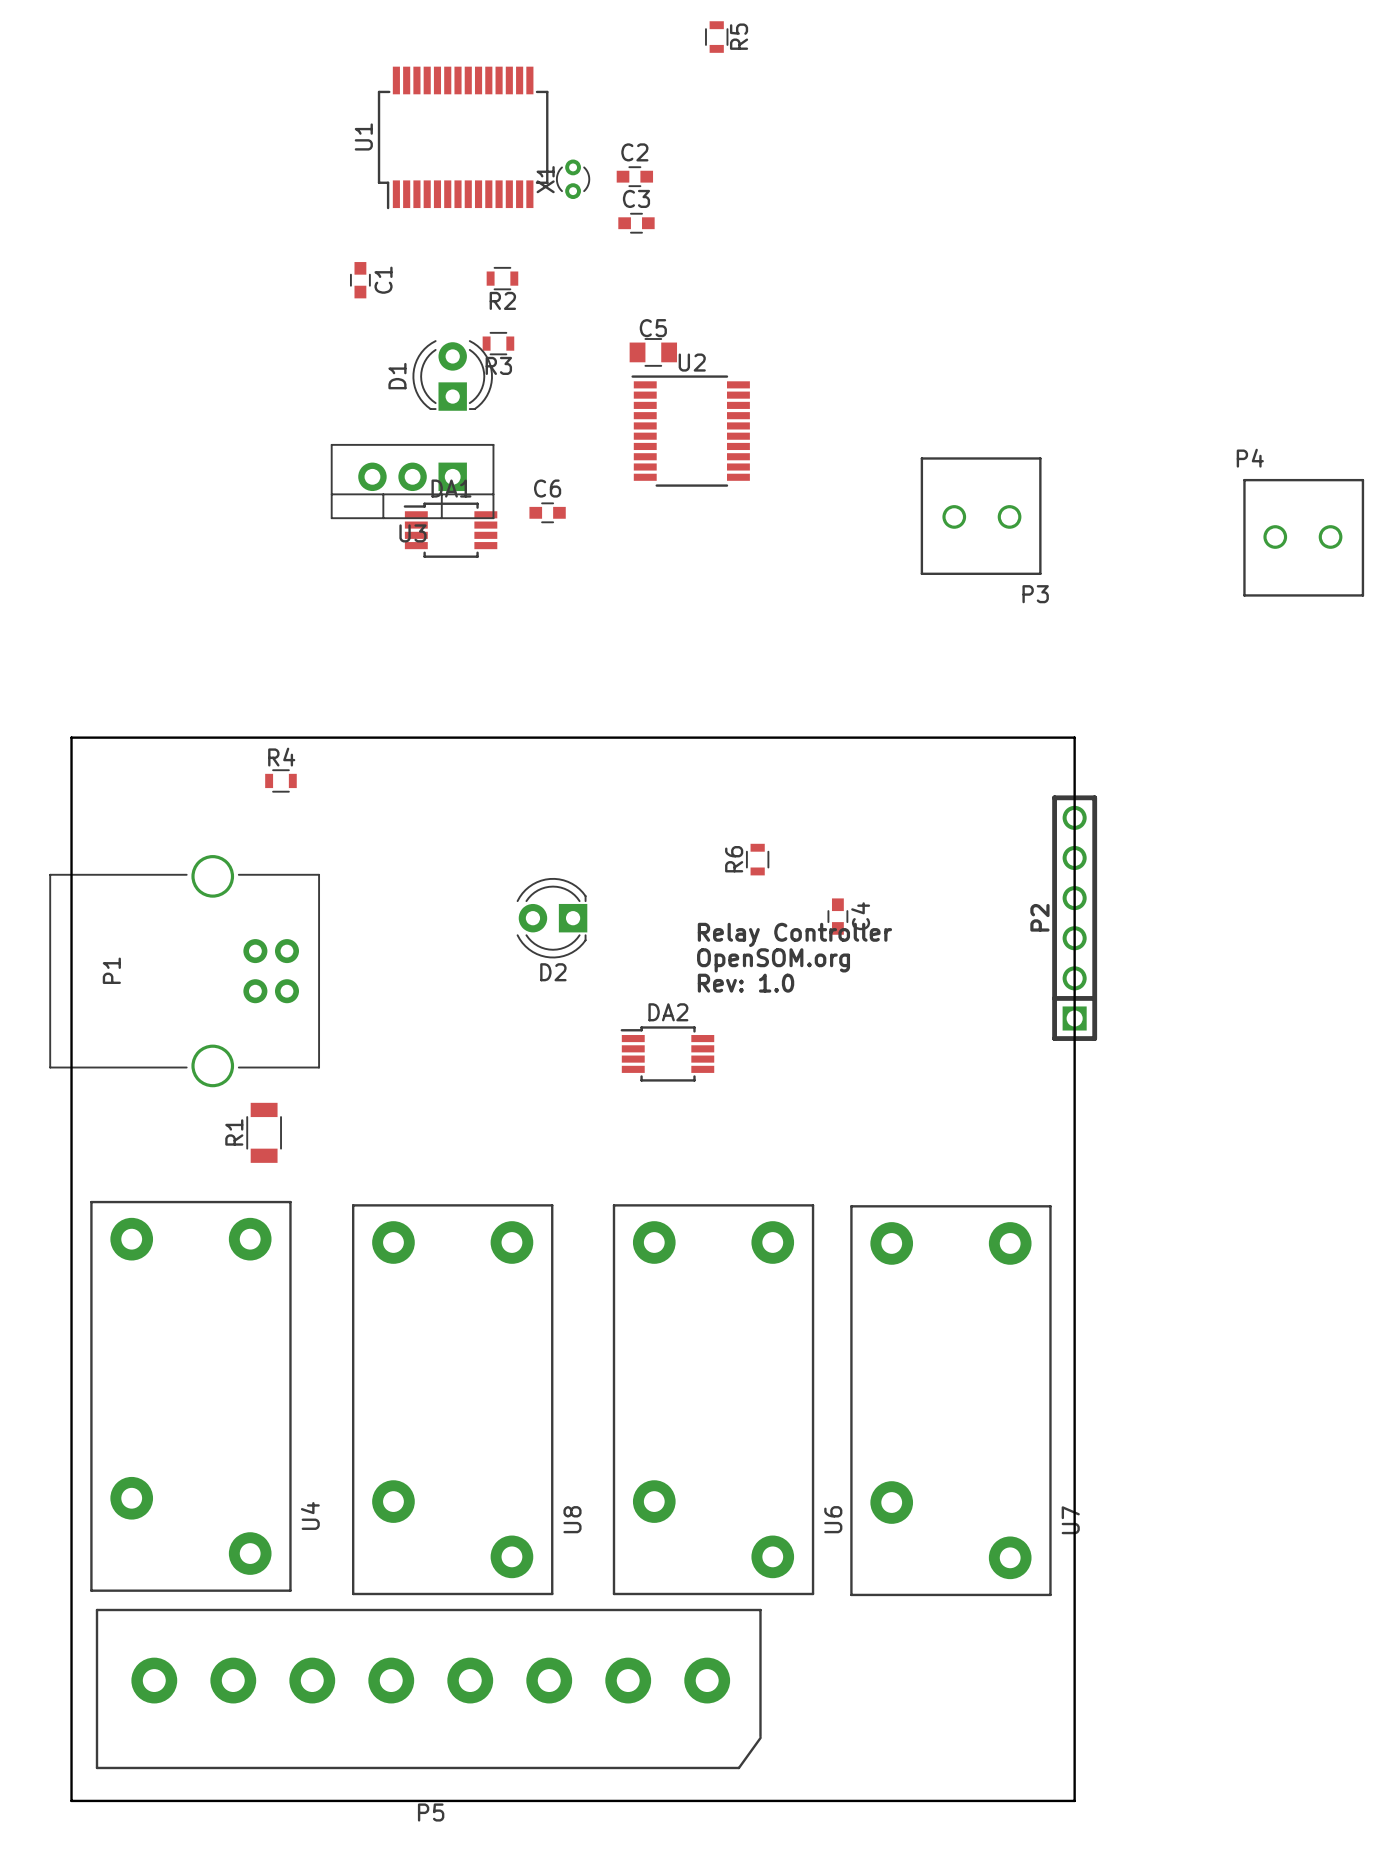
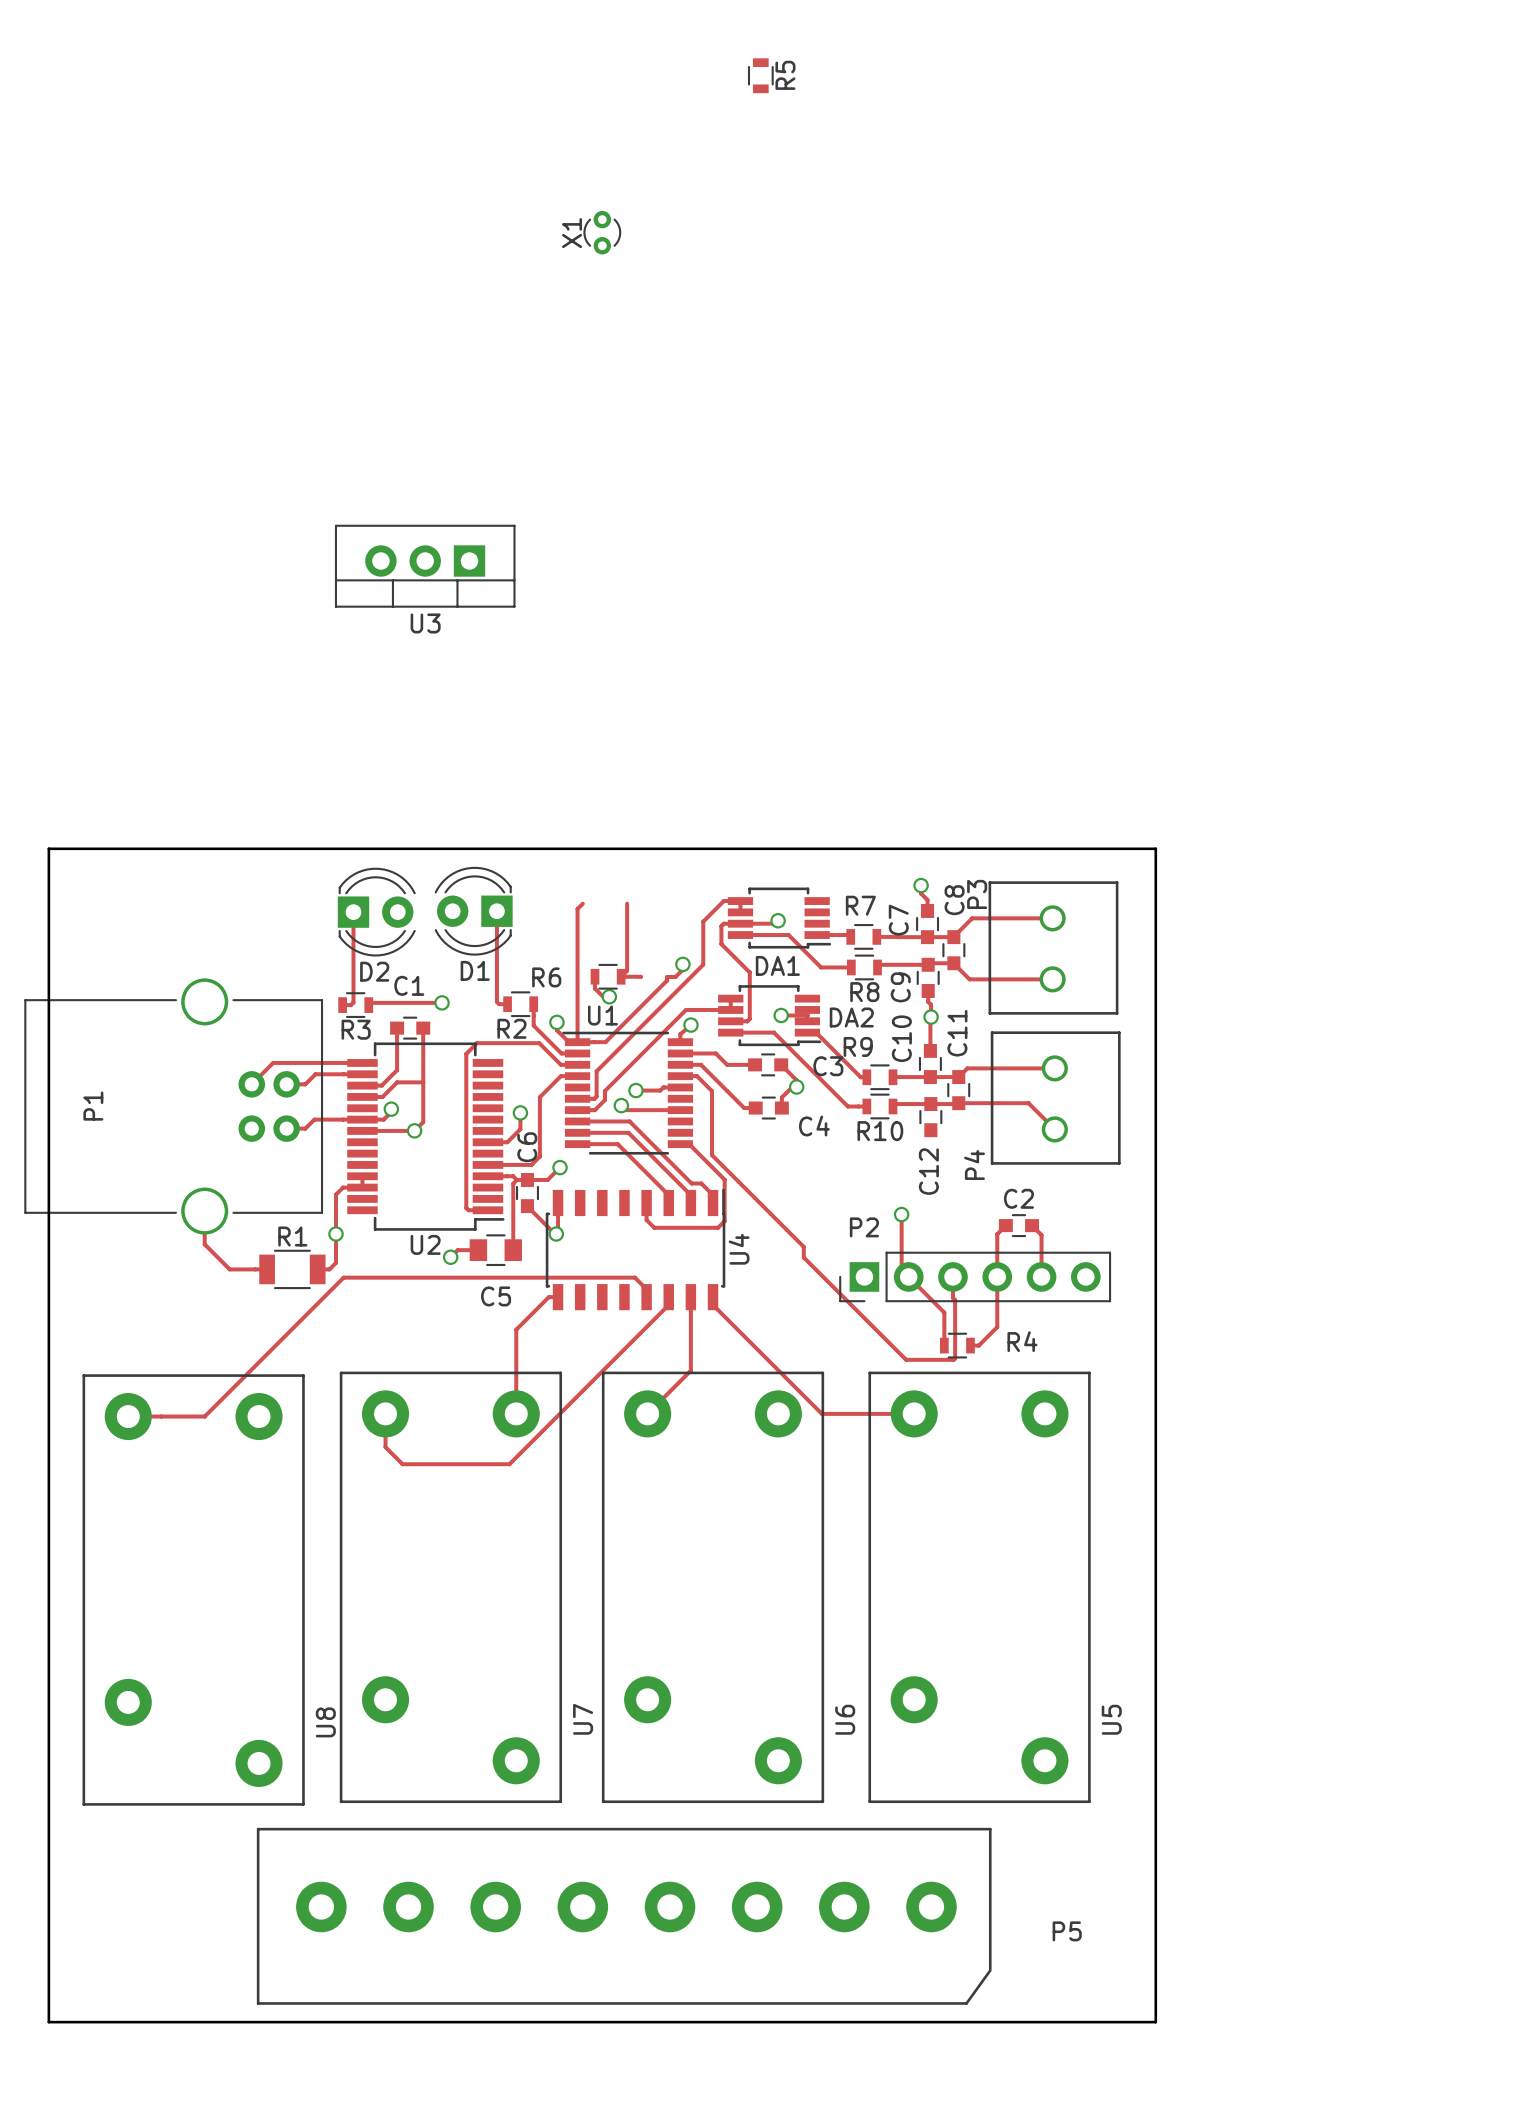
U1 footprint: [377, 66, 549, 210] -> [562, 1031, 694, 1155]
U1 name position: U1 (363, 136) -> U1 (602, 1015)
C2 position: (634, 176) -> (1018, 1225)
C3 name position: C3 (636, 198) -> C3 (828, 1066)
C3 position: (636, 223) -> (768, 1064)
R2 position: (502, 278) -> (520, 1004)
C1 rotation: 0° (360, 280) -> 90° clockwise (410, 1028)
C1 position: (360, 280) -> (410, 1028)
C1 name position: C1 (383, 280) -> C1 (409, 985)
R2 name position: R2 (502, 300) -> R2 (511, 1028)
C5 name position: C5 (653, 328) -> C5 (496, 1296)
R3 position: (498, 343) -> (355, 1005)
C5 position: (653, 352) -> (495, 1250)
U2 name position: U2 (692, 362) -> U2 (425, 1244)
D1 rotation: 0° (452, 375) -> 90° counterclockwise (473, 911)
D1 position: (452, 375) -> (473, 911)
U2 footprint: [631, 375, 750, 487] -> [347, 1042, 505, 1231]
C6 rotation: 0° (547, 512) -> 90° clockwise (527, 1193)
C6 position: (547, 512) -> (527, 1193)
P3 rotation: 0° (981, 516) -> 90° clockwise (1053, 947)
P3 position: (981, 516) -> (1053, 947)
DA1 rotation: 0° (450, 530) -> 180° (779, 918)
DA1 position: (450, 530) -> (779, 918)
P4 rotation: 0° (1303, 537) -> 90° counterclockwise (1055, 1098)
P4 position: (1303, 537) -> (1055, 1098)
P3 name position: P3 (1035, 594) -> P3 (977, 894)
R4 name position: R4 (281, 757) -> R4 (1022, 1341)
track: none -> (921, 885) (921, 893) (927, 900) (927, 911)
via: none -> (921, 885)
R4 position: (280, 780) -> (957, 1345)
track: none -> (582, 903) (577, 908) (577, 1042)
track: none -> (627, 903) (627, 970) (621, 976) (640, 976)
track: none -> (496, 911) (496, 1001) (499, 1004) (507, 1004)
track: none -> (353, 912) (353, 1002) (350, 1005) (342, 1005)
track: none -> (740, 912) (740, 901) (723, 901) (703, 921) (703, 964) (596, 1071) (596, 1096) (594, 1098) (577, 1098)
P2 footprint: [1052, 795, 1098, 1041] -> [839, 1251, 1112, 1303]
track: none -> (1052, 918) (972, 918) (953, 937) (898, 937)
track: none -> (778, 920) (775, 923) (723, 923) (721, 926) (721, 944) (749, 972) (749, 1019) (747, 1021) (730, 1021)
via: none -> (778, 920)
C7: none -> (927, 924)
track: none -> (740, 935) (788, 935) (821, 967) (851, 967)
track: none -> (817, 935) (848, 935) (850, 936)
R7: none -> (863, 936)
track: none -> (876, 936) (898, 936)
C8: none -> (953, 950)
track: none -> (682, 964) (682, 970) (675, 976) (667, 976) (667, 980) (605, 1042) (568, 1042) (556, 1030) (556, 1022)
via: none -> (682, 964)
R8: none -> (864, 967)
track: none -> (877, 967) (880, 964) (953, 963) (969, 979) (1052, 979)
track: none -> (595, 976) (595, 988) (604, 997) (609, 996) (607, 997)
C9: none -> (928, 977)
R6 name position: R6 (734, 859) -> R6 (546, 977)
R6 rotation: 0° (757, 859) -> 90° clockwise (608, 976)
R6 position: (757, 859) -> (608, 976)
track: none -> (928, 990) (928, 1001) (931, 1004) (930, 1050)
via: none -> (609, 996)
track: none -> (730, 998) (730, 1009) (686, 1009) (605, 1090) (605, 1100) (594, 1110) (577, 1110)
track: none -> (442, 1002) (370, 1002) (368, 1005)
via: none -> (442, 1002)
track: none -> (533, 1004) (533, 1025) (561, 1053) (577, 1053)
track: none -> (781, 1015) (807, 1015)
via: none -> (781, 1015)
via: none -> (931, 1017)
via: none -> (556, 1022)
track: none -> (690, 1024) (680, 1034) (680, 1042)
via: none -> (690, 1025)
track: none -> (397, 1028) (397, 1070) (381, 1085) (362, 1085)
track: none -> (423, 1028) (423, 1122) (414, 1130) (362, 1130)
track: none -> (730, 1032) (774, 1032) (847, 1106) (866, 1106)
track: none -> (807, 1032) (816, 1032) (860, 1077) (866, 1077)
C4 rotation: 0° (837, 916) -> 90° clockwise (768, 1108)
C4 position: (837, 916) -> (768, 1108)
P2 name position: P2 (1039, 917) -> P2 (864, 1227)
D2 rotation: 0° (551, 918) -> 180° (376, 912)
D2 position: (551, 918) -> (376, 912)
track: none -> (680, 1053) (715, 1053) (727, 1064) (755, 1064)
track: none -> (362, 1062) (273, 1062) (251, 1084)
C10: none -> (930, 1063)
track: none -> (577, 1064) (560, 1064) (539, 1043) (477, 1043) (466, 1053) (466, 1207) (468, 1210) (487, 1210)
track: none -> (680, 1064) (700, 1064) (744, 1108) (755, 1108)
track: none -> (781, 1064) (796, 1080) (796, 1087) (792, 1087) (781, 1097) (781, 1108)
text: Relay Controller (794, 934) -> none
track: none -> (1054, 1068) (967, 1068) (958, 1077) (893, 1077)
track: none -> (362, 1074) (315, 1074) (305, 1084) (286, 1084)
track: none -> (577, 1076) (560, 1076) (539, 1097) (539, 1156) (531, 1164) (487, 1164)
track: none -> (680, 1076) (697, 1076) (712, 1091) (712, 1155) (803, 1246) (803, 1257) (906, 1359) (955, 1358) (955, 1300) (952, 1297) (952, 1276)
R9: none -> (879, 1077)
track: none -> (423, 1082) (397, 1082) (382, 1096) (362, 1096)
track: none -> (680, 1087) (663, 1087) (660, 1090) (635, 1090)
via: none -> (796, 1087)
via: none -> (635, 1090)
C11: none -> (958, 1090)
text: OpenSOM.org (773, 960) -> none
track: none -> (621, 1105) (625, 1110) (680, 1110)
via: none -> (621, 1105)
R10: none -> (879, 1106)
track: none -> (893, 1106) (895, 1104) (1028, 1103) (1054, 1129)
track: none -> (391, 1109) (391, 1112) (383, 1119) (314, 1119) (305, 1128) (286, 1128)
via: none -> (391, 1109)
track: none -> (520, 1112) (520, 1129) (507, 1142) (487, 1142)
via: none -> (520, 1112)
C12: none -> (930, 1117)
text: Rev: 1.0 (746, 983) -> none
track: none -> (577, 1121) (629, 1121) (691, 1183) (701, 1183) (713, 1195) (713, 1203)
via: none -> (414, 1130)
track: none -> (577, 1132) (628, 1132) (690, 1195) (690, 1203)
track: none -> (577, 1144) (617, 1144) (668, 1195) (668, 1203)
track: none -> (680, 1144) (689, 1144) (724, 1179) (724, 1221) (718, 1227) (654, 1227) (646, 1220) (646, 1203)
DA2 name position: DA2 (668, 1012) -> DA2 (851, 1017)
track: none -> (560, 1167) (547, 1179) (516, 1179)
via: none -> (560, 1167)
track: none -> (362, 1176) (362, 1187) (343, 1187) (336, 1194) (336, 1262) (329, 1269) (317, 1269)
track: none -> (487, 1176) (513, 1176) (516, 1179)
track: none -> (516, 1179) (513, 1183) (513, 1250)
DA2 rotation: 0° (667, 1053) -> 180° (769, 1015)
DA2 position: (667, 1053) -> (769, 1015)
track: none -> (558, 1203) (558, 1232) (556, 1234) (527, 1206)
track: none -> (204, 1211) (204, 1244) (229, 1269) (267, 1269)
track: none -> (901, 1214) (901, 1269) (944, 1312) (944, 1345)
via: none -> (901, 1214)
track: none -> (1005, 1225) (997, 1234) (997, 1327) (978, 1345) (970, 1345)
track: none -> (1032, 1225) (1041, 1235) (1041, 1276)
via: none -> (336, 1234)
via: none -> (556, 1234)
track: none -> (478, 1250) (457, 1250) (450, 1257)
via: none -> (450, 1257)
R1 rotation: 0° (264, 1132) -> 90° clockwise (292, 1269)
track: none -> (558, 1297) (548, 1297) (516, 1329) (516, 1413)
track: none -> (646, 1297) (646, 1289) (634, 1277) (343, 1277) (204, 1416) (128, 1416)
track: none -> (668, 1297) (668, 1304) (509, 1464) (402, 1464) (385, 1447) (385, 1413)
track: none -> (690, 1297) (690, 1370) (647, 1413)
track: none -> (713, 1297) (713, 1304) (821, 1413) (914, 1413)
U4 footprint: [90, 1200, 292, 1592] -> [545, 1188, 726, 1311]
U8 position: (452, 1399) -> (193, 1589)
U6 position: (713, 1399) -> (713, 1587)
U7 position: (950, 1400) -> (450, 1587)
U5: none -> (979, 1587)
U4 name position: U4 (310, 1515) -> U4 (739, 1249)
P5 position: (428, 1689) -> (624, 1916)
P5 name position: P5 (431, 1812) -> P5 (1067, 1931)

